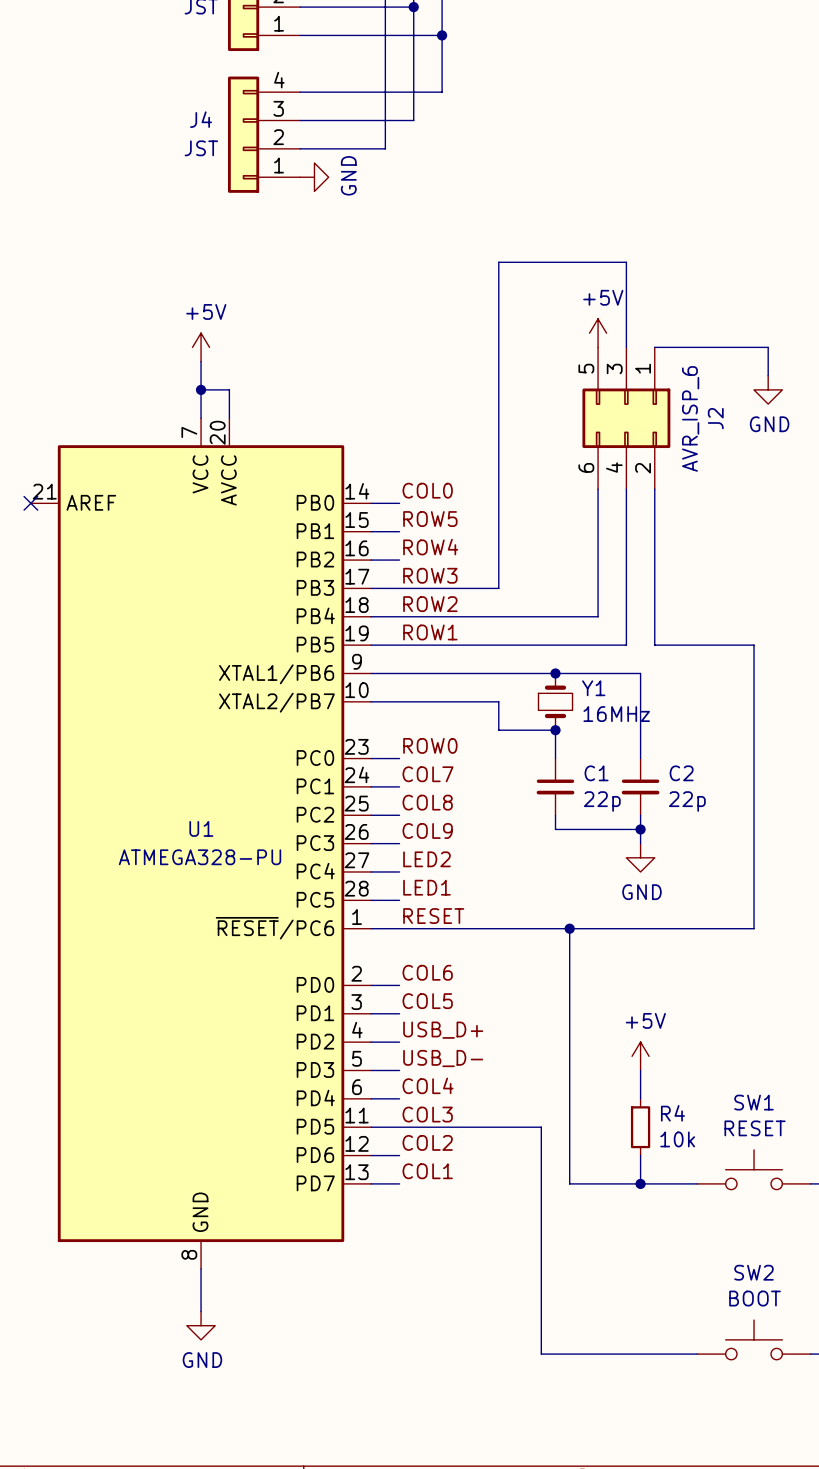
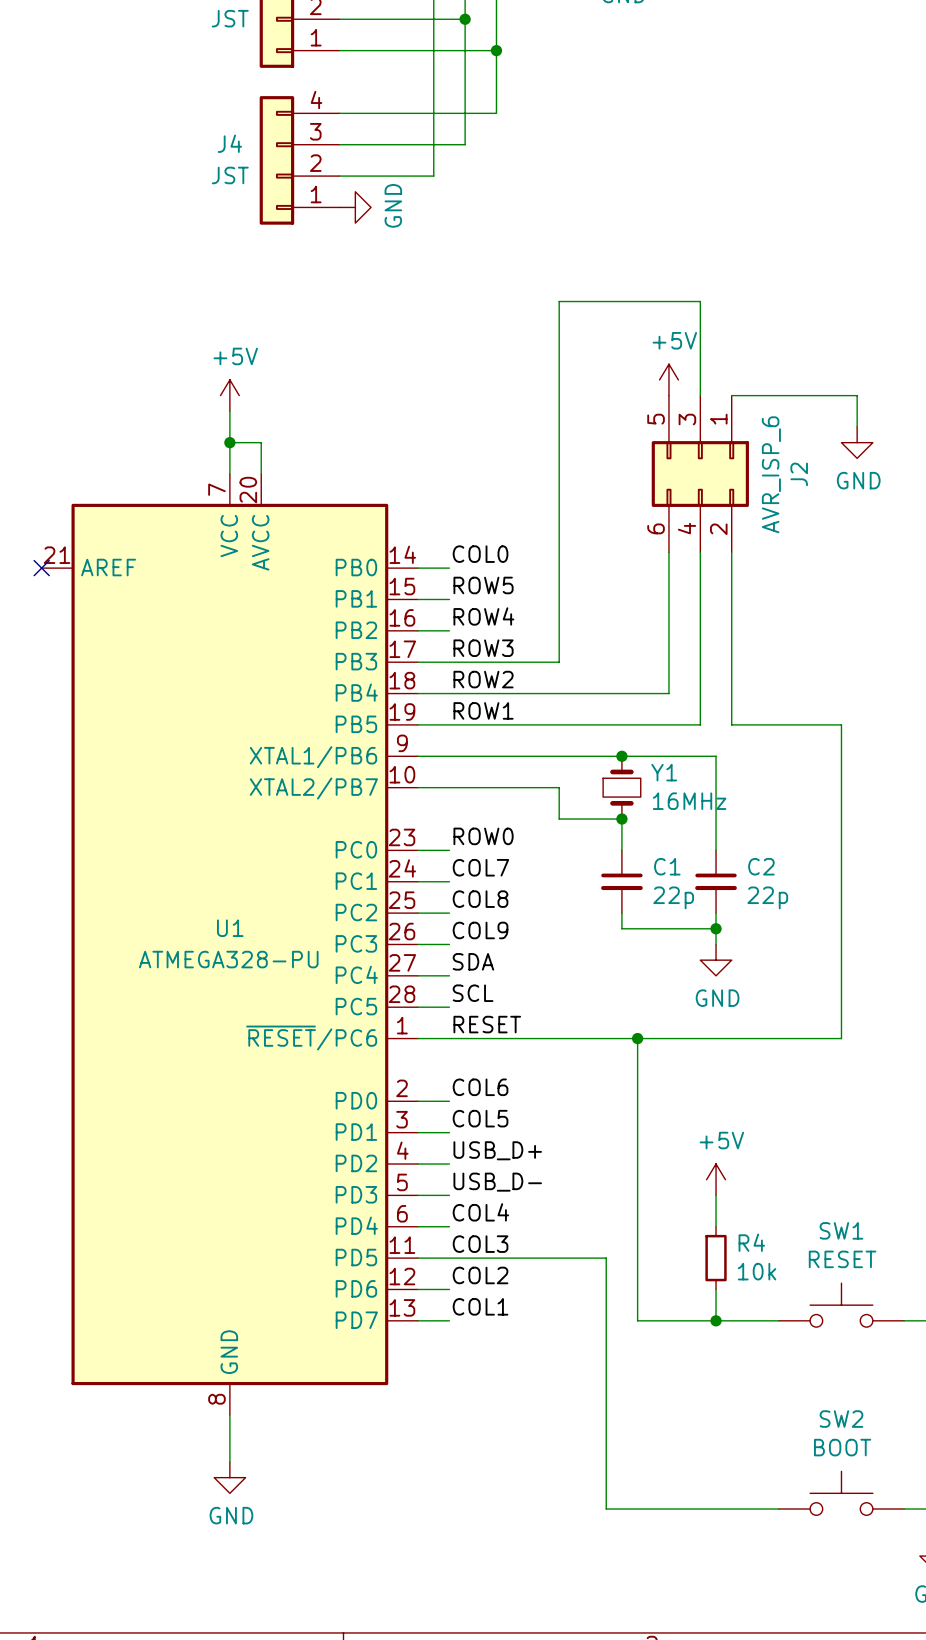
label: LED2 (426, 859) -> SDA (473, 961)
label: LED1 (426, 887) -> SCL (473, 993)

